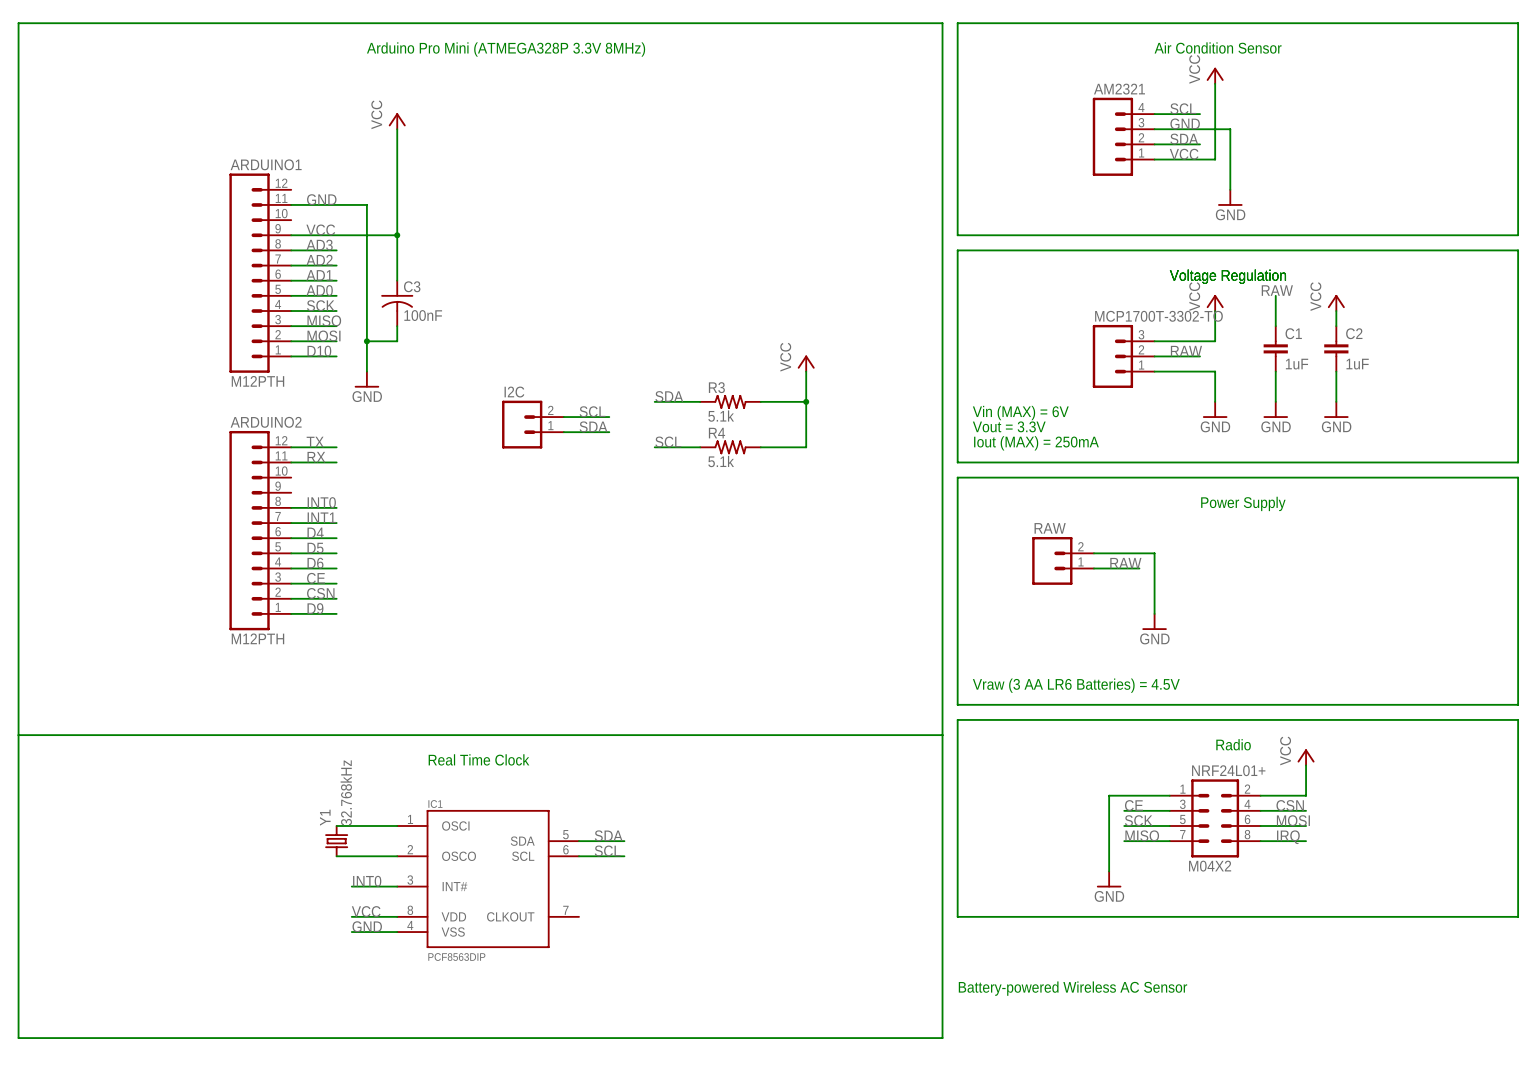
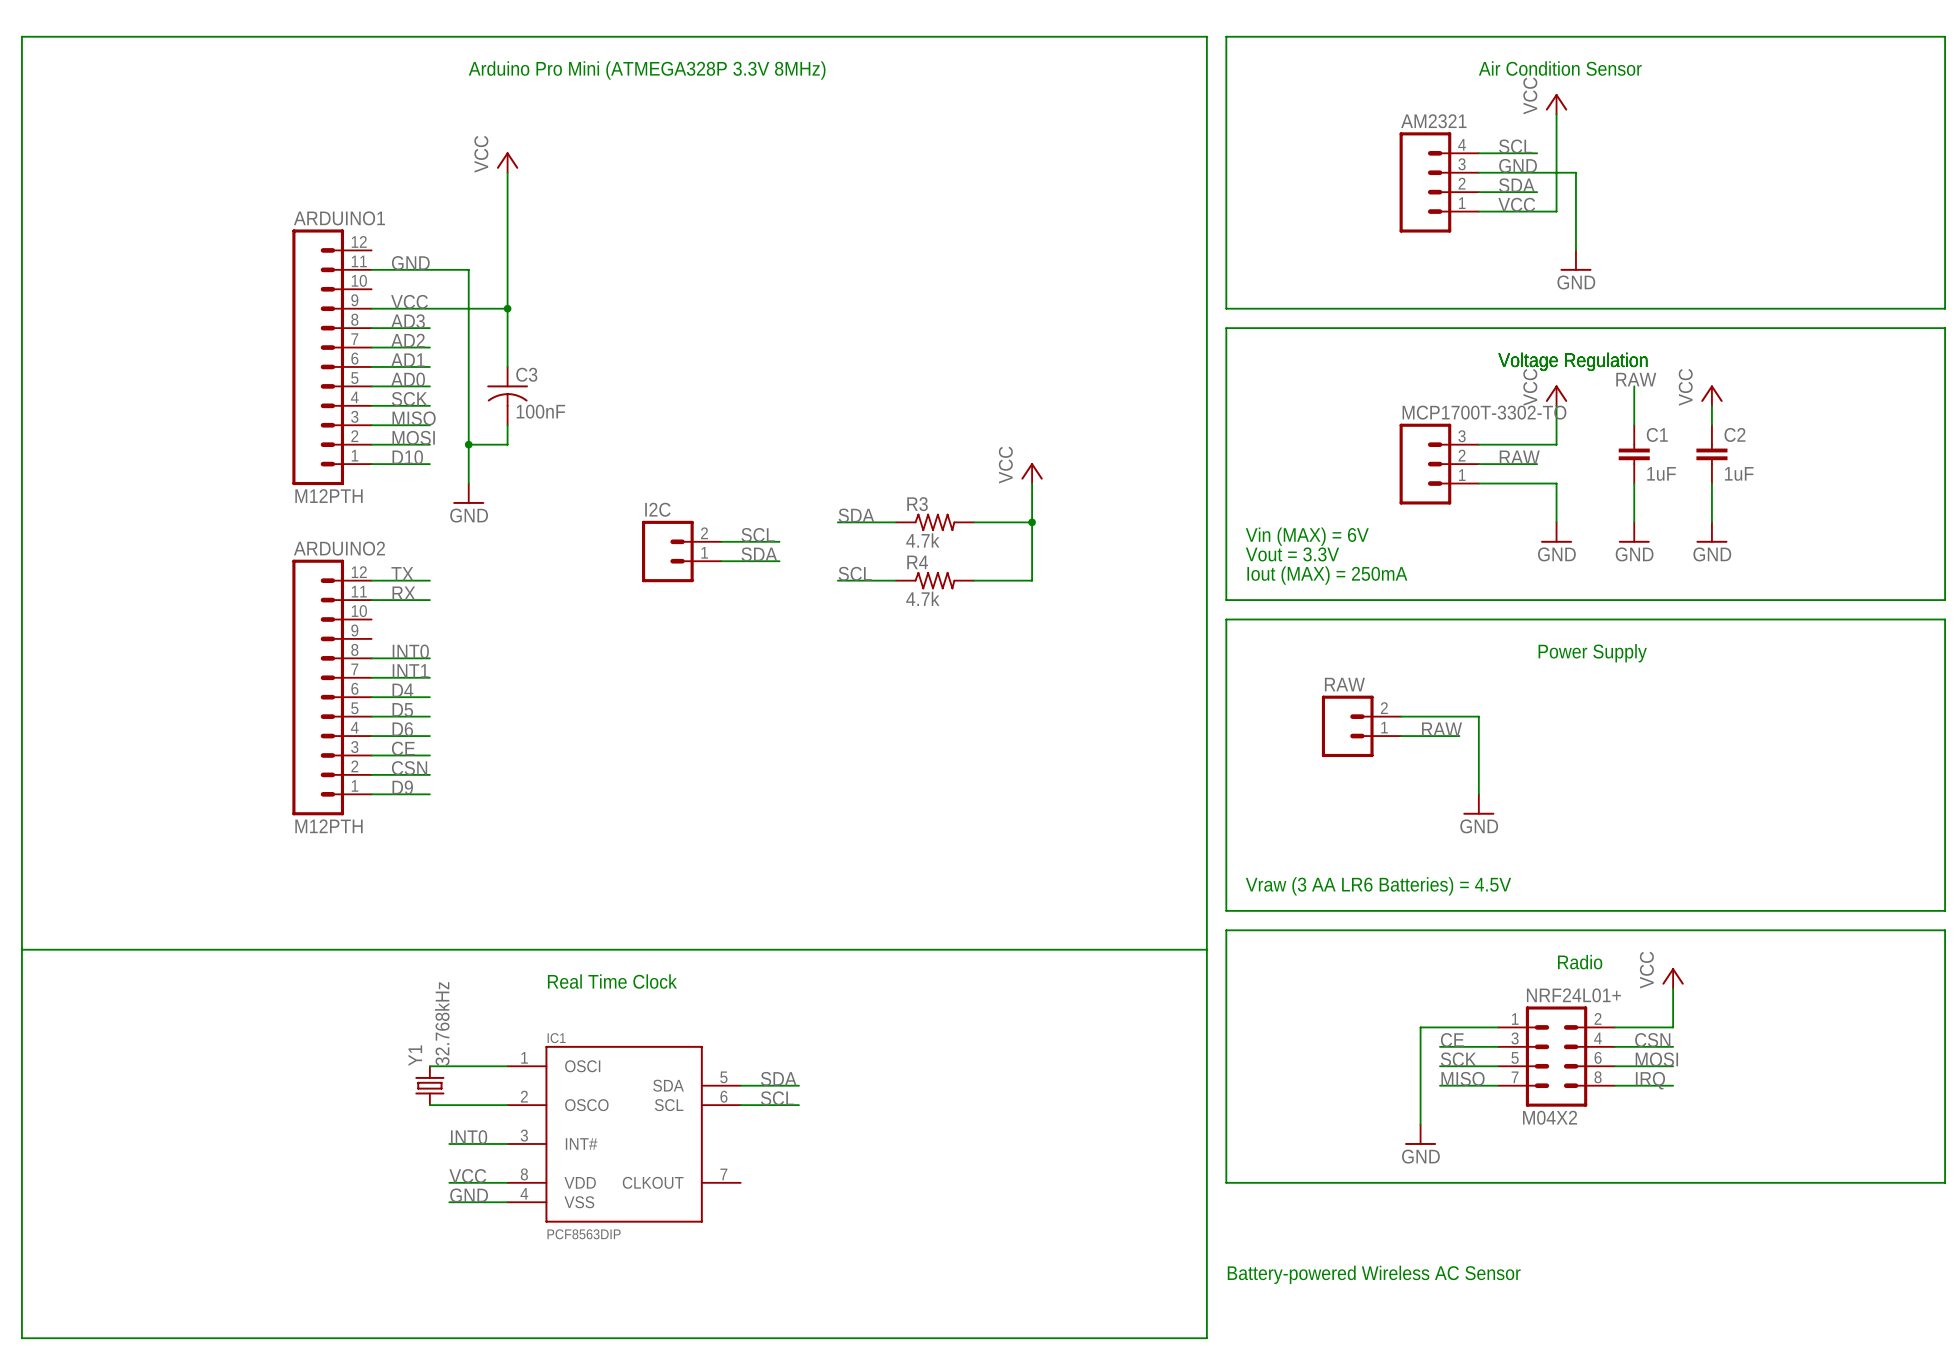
R3 value: 5.1k (721, 416) -> 4.7k (922, 540)
R4 value: 5.1k (721, 461) -> 4.7k (922, 598)

